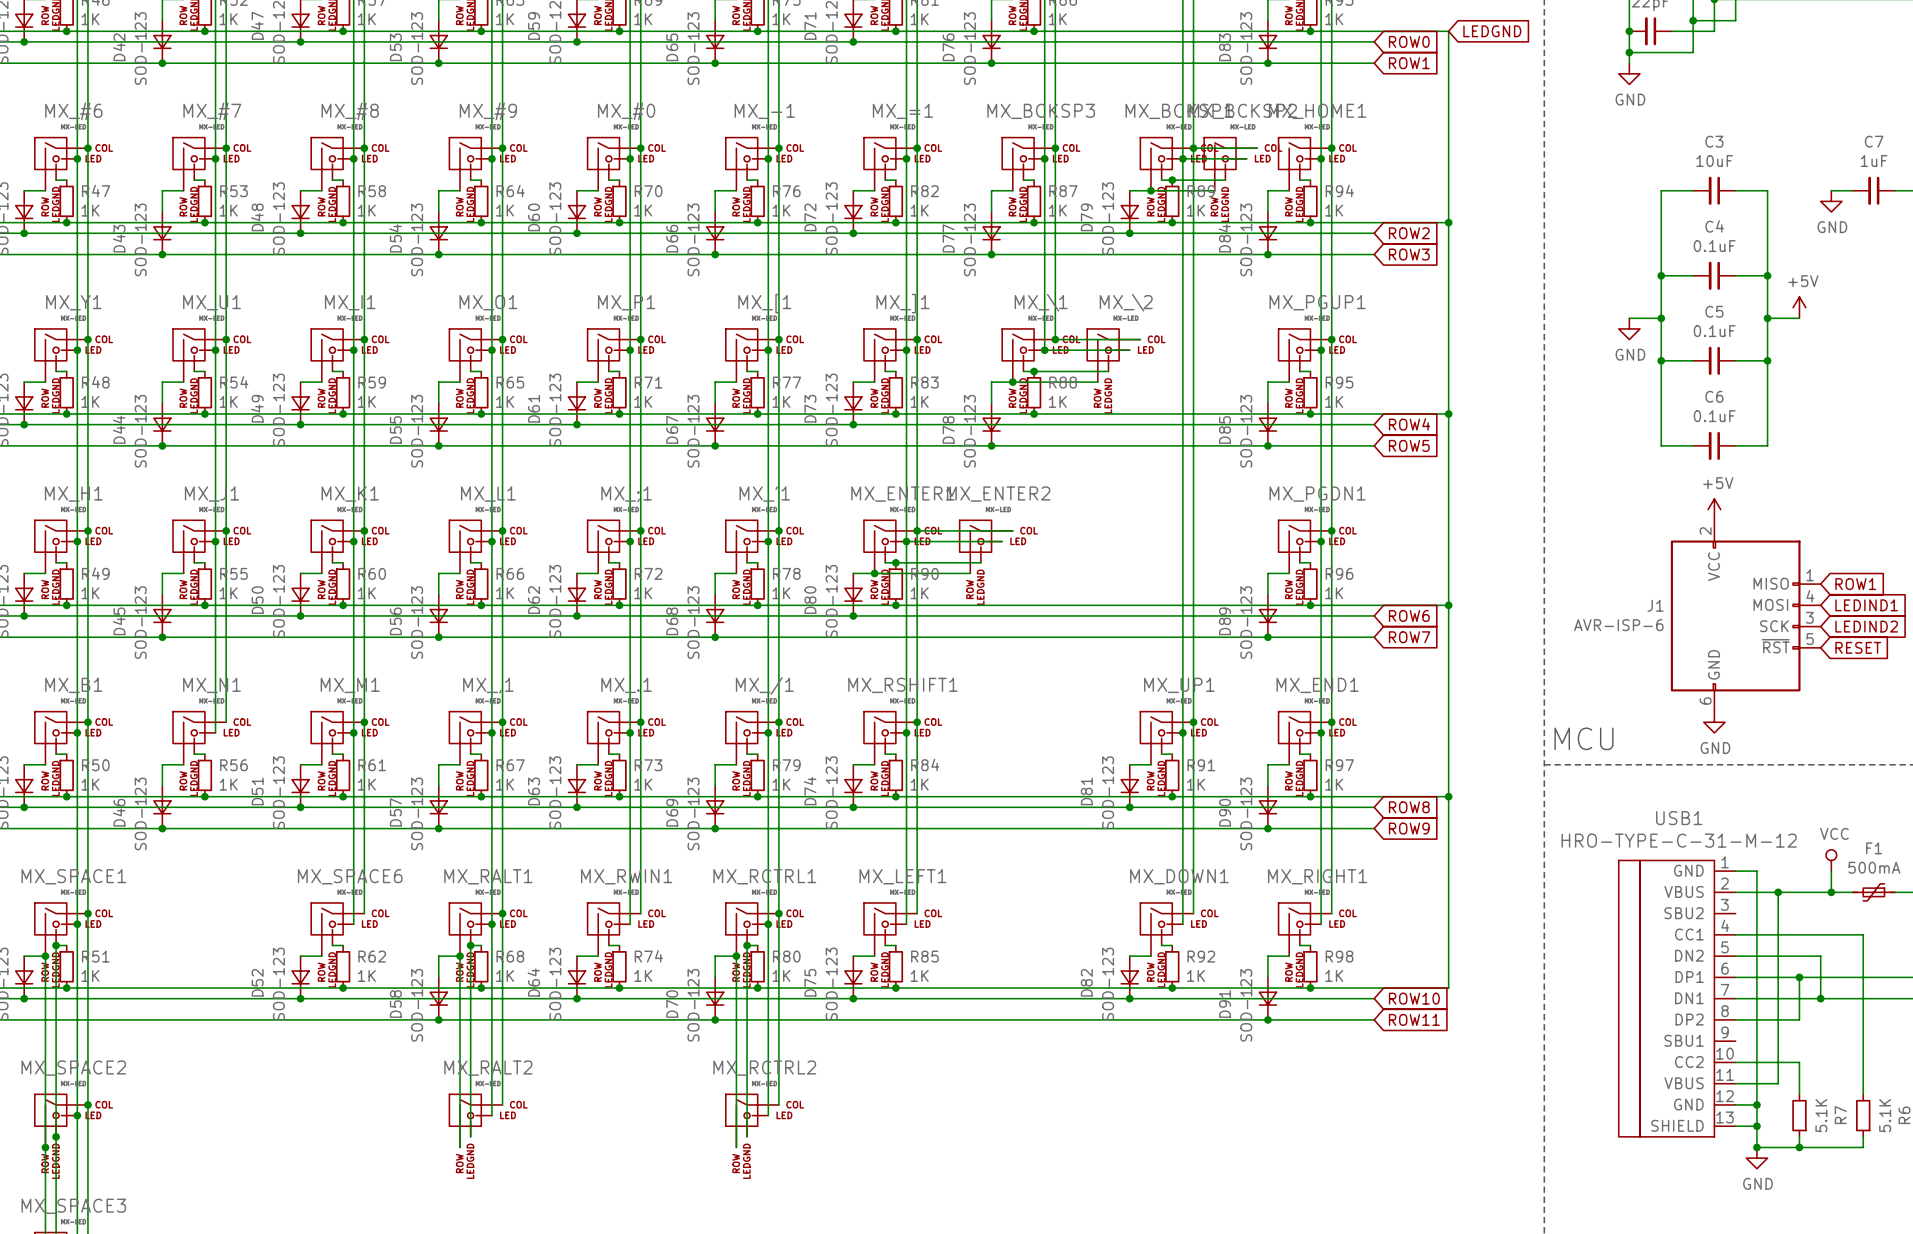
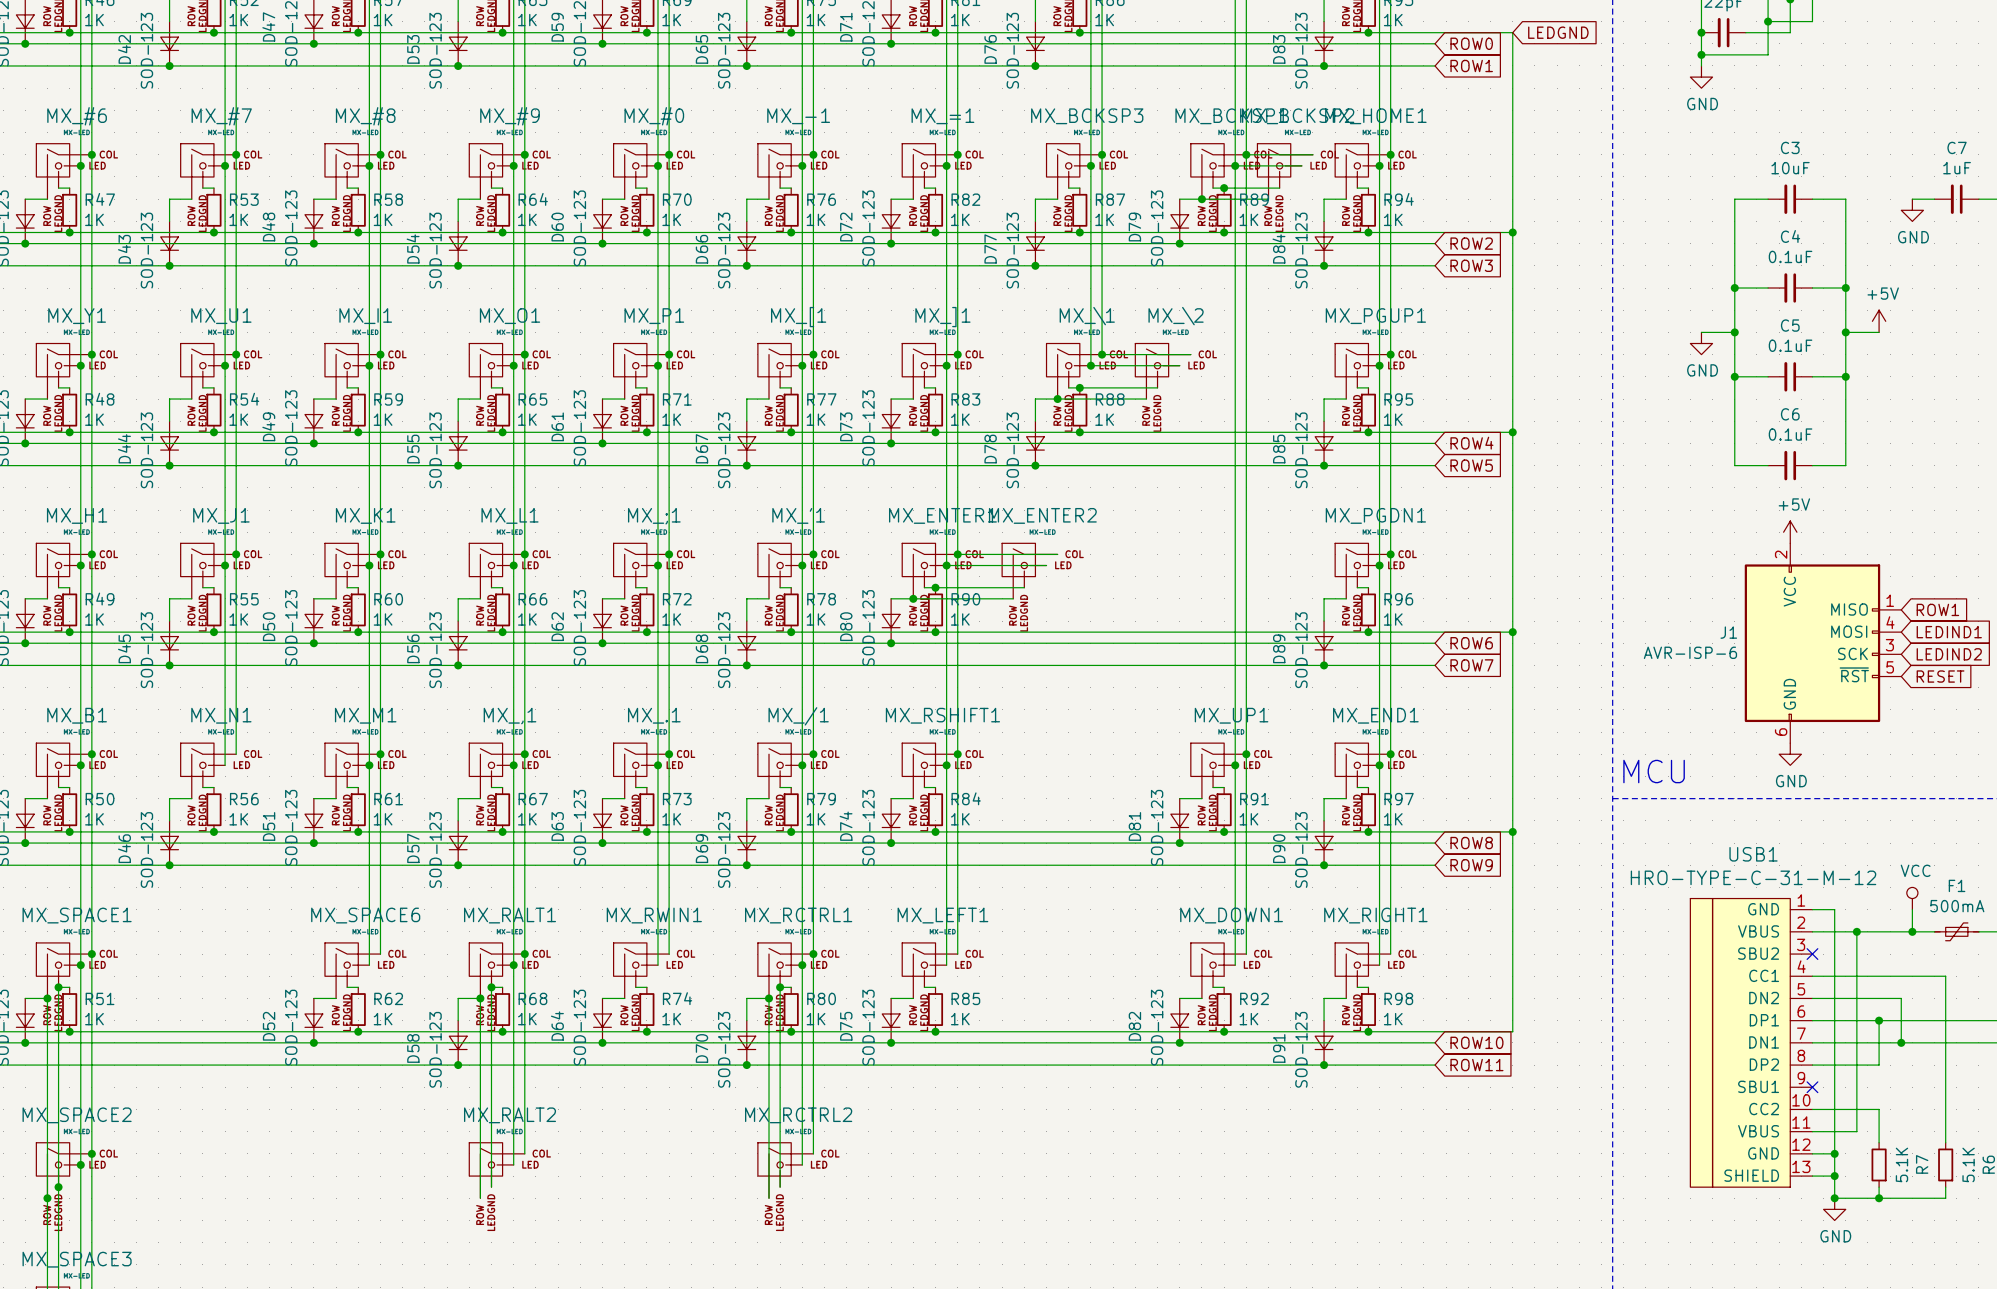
no-connect mark: none -> (1812, 954)
no-connect mark: none -> (1812, 1087)

